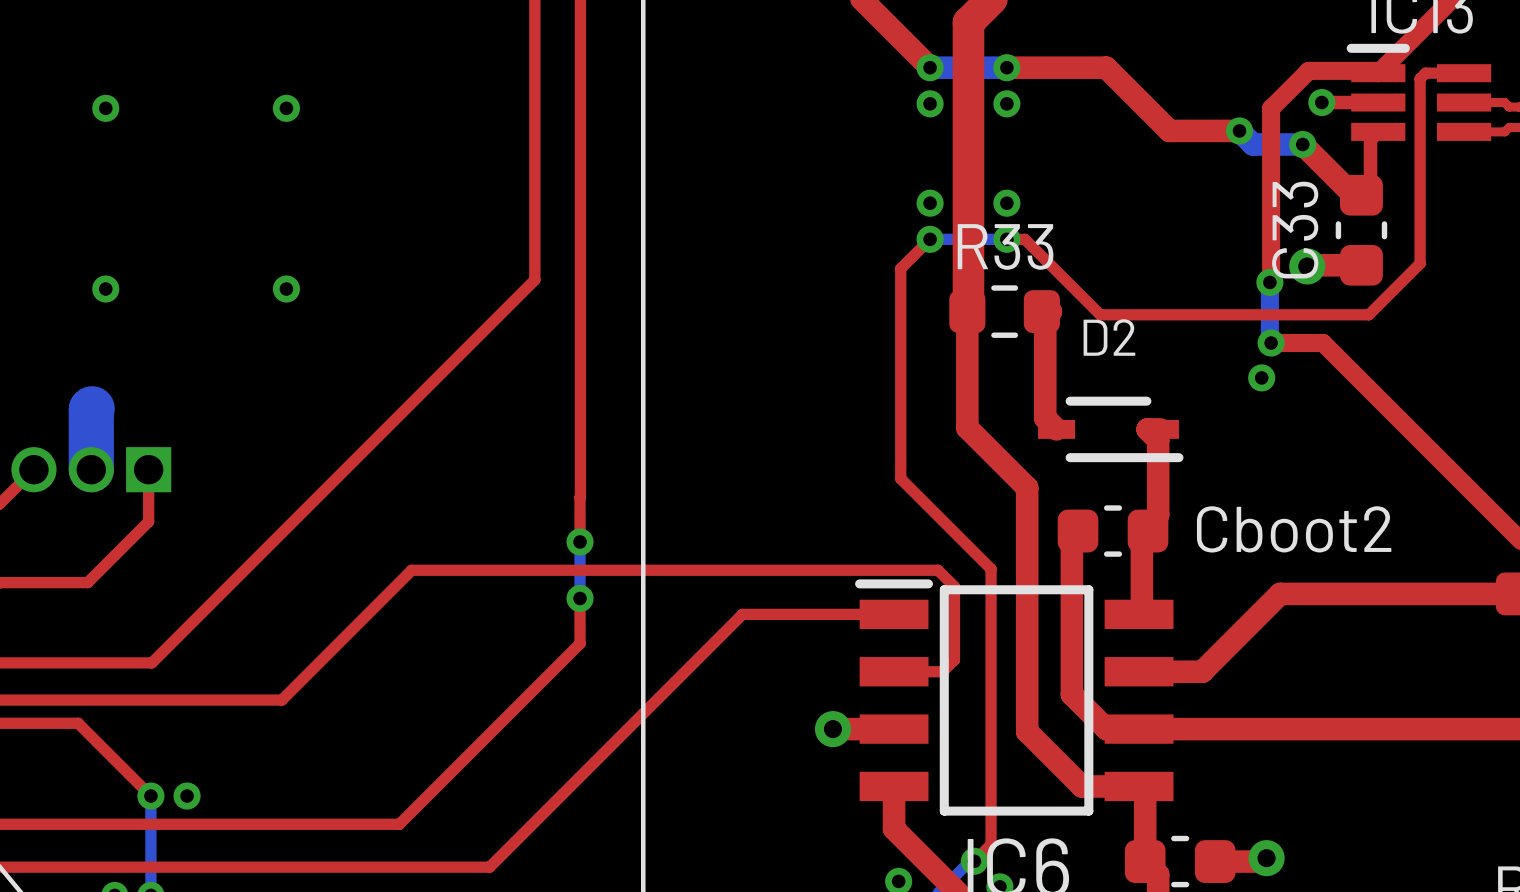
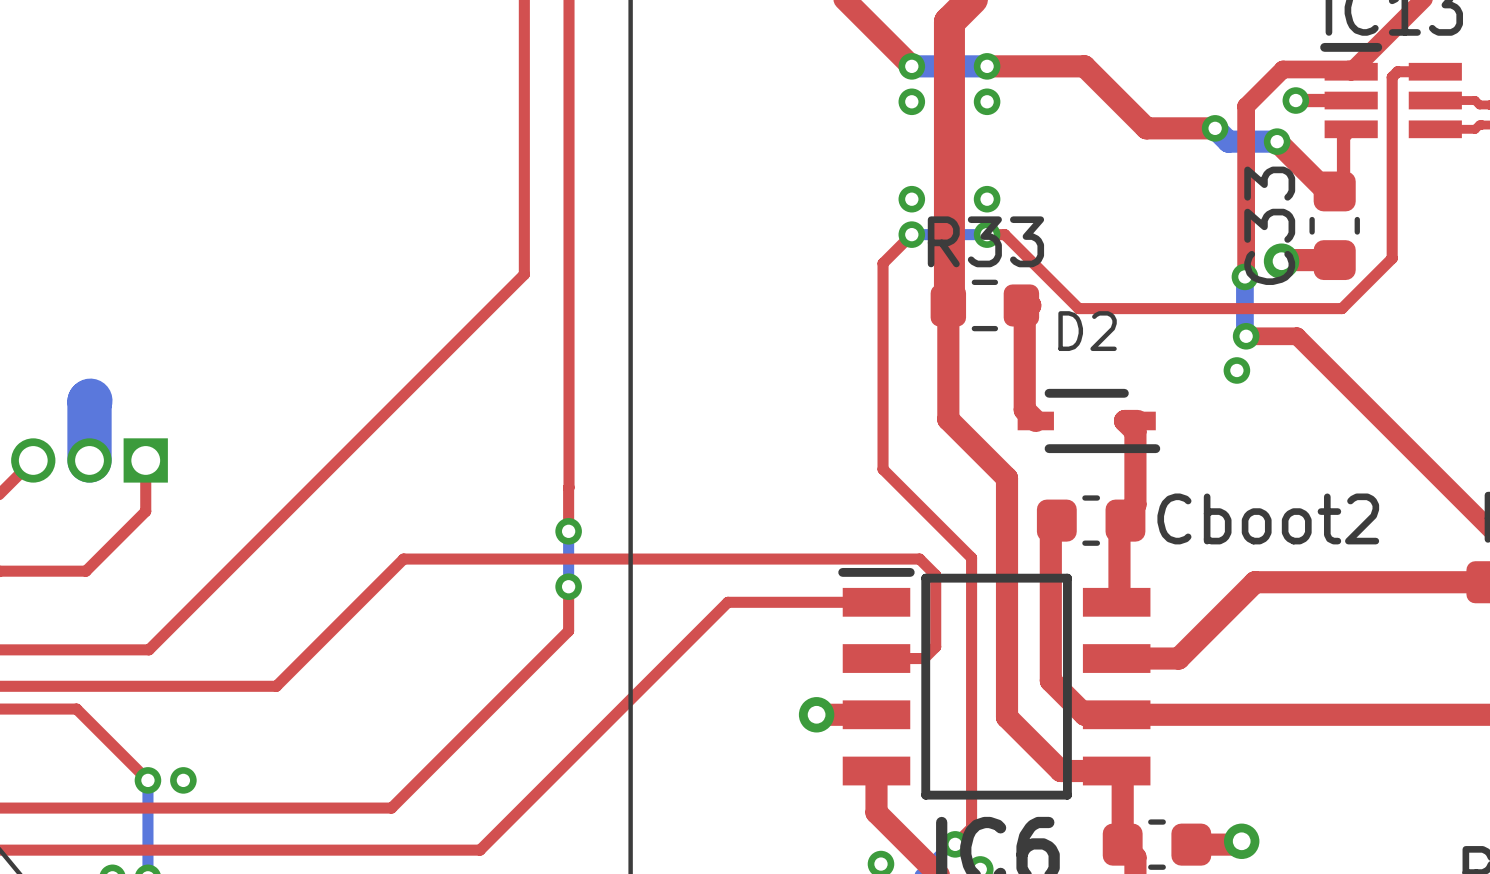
via: (105, 108) -> none
via: (286, 108) -> none
via: (105, 289) -> none
via: (286, 289) -> none

